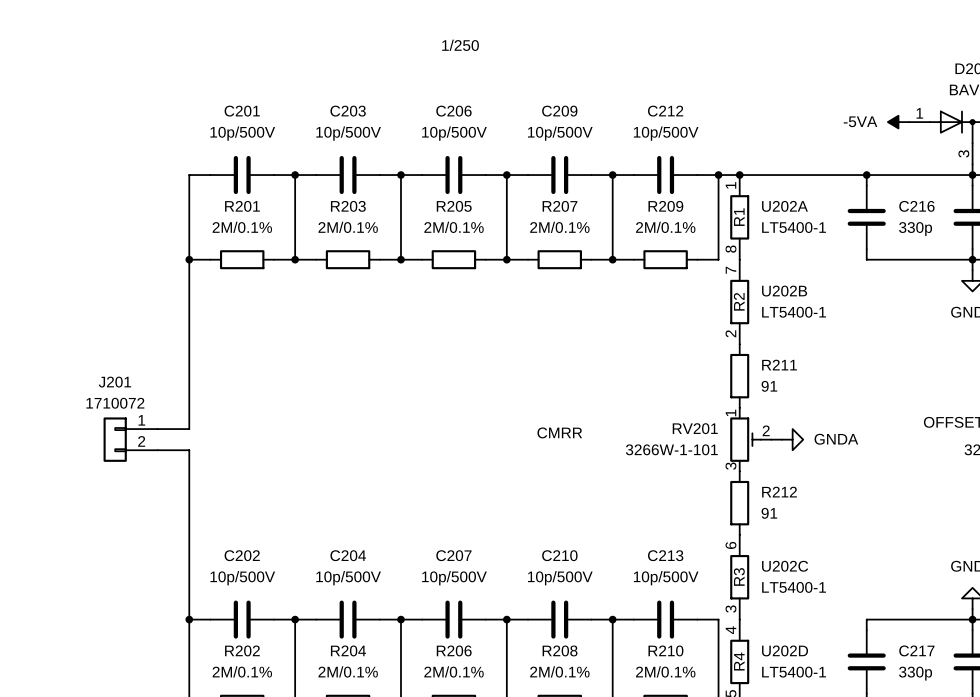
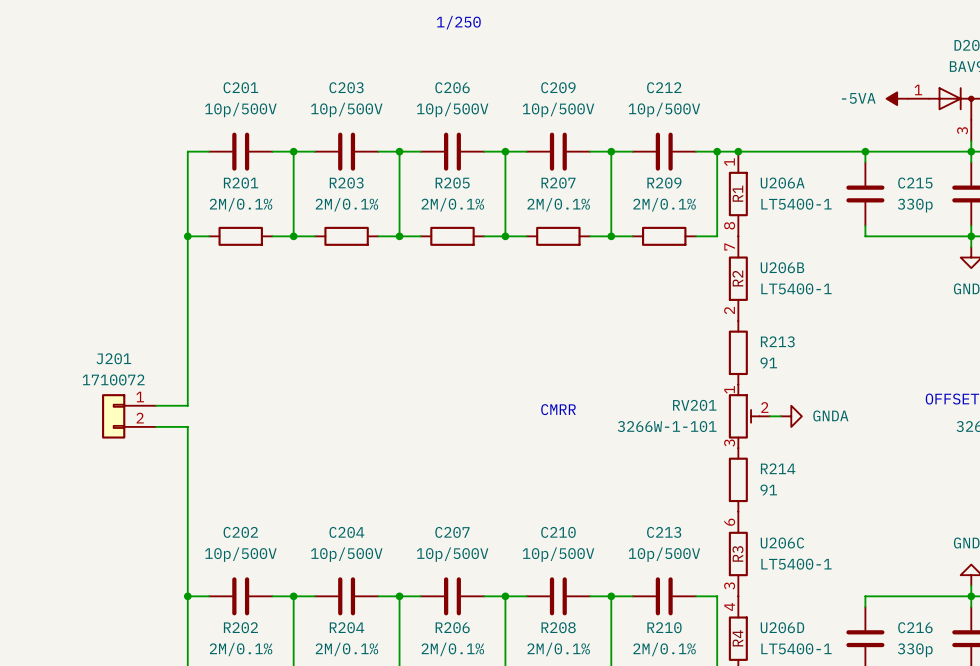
U202A name: U202A (784, 206) -> U206A (782, 183)
C216 name: C216 (916, 206) -> C215 (915, 183)
U202B name: U202B (784, 291) -> U206B (782, 267)
R211 name: R211 (779, 365) -> R213 (777, 341)
R212 name: R212 (779, 492) -> R214 (778, 468)
U202C name: U202C (785, 566) -> U206C (782, 543)
U202D name: U202D (785, 650) -> U206D (782, 627)
C217 name: C217 (916, 650) -> C216 (915, 627)

